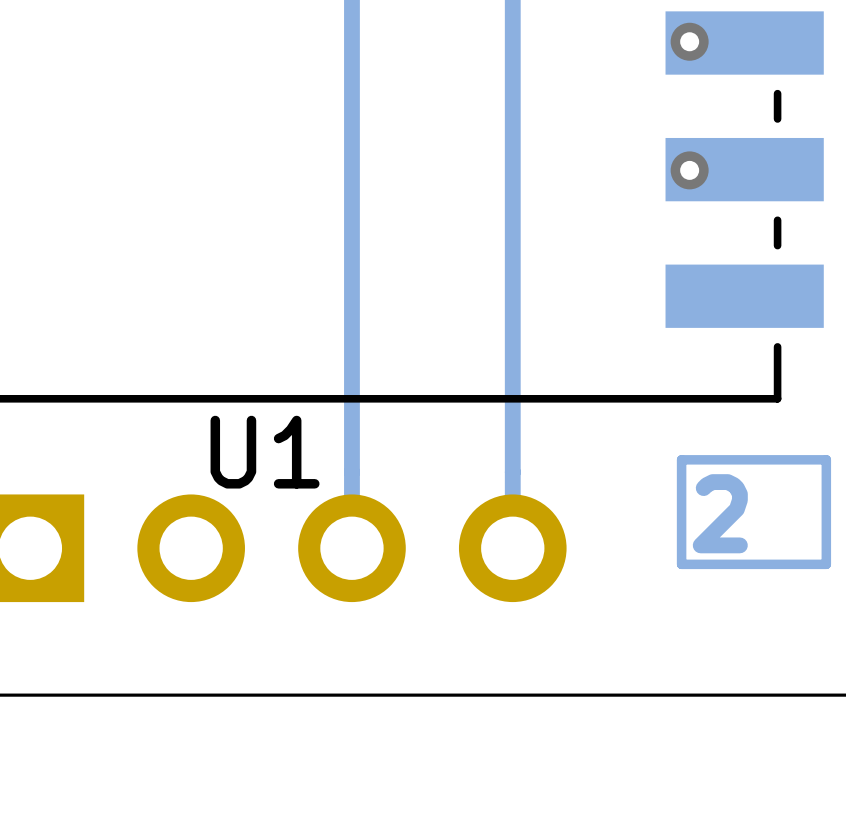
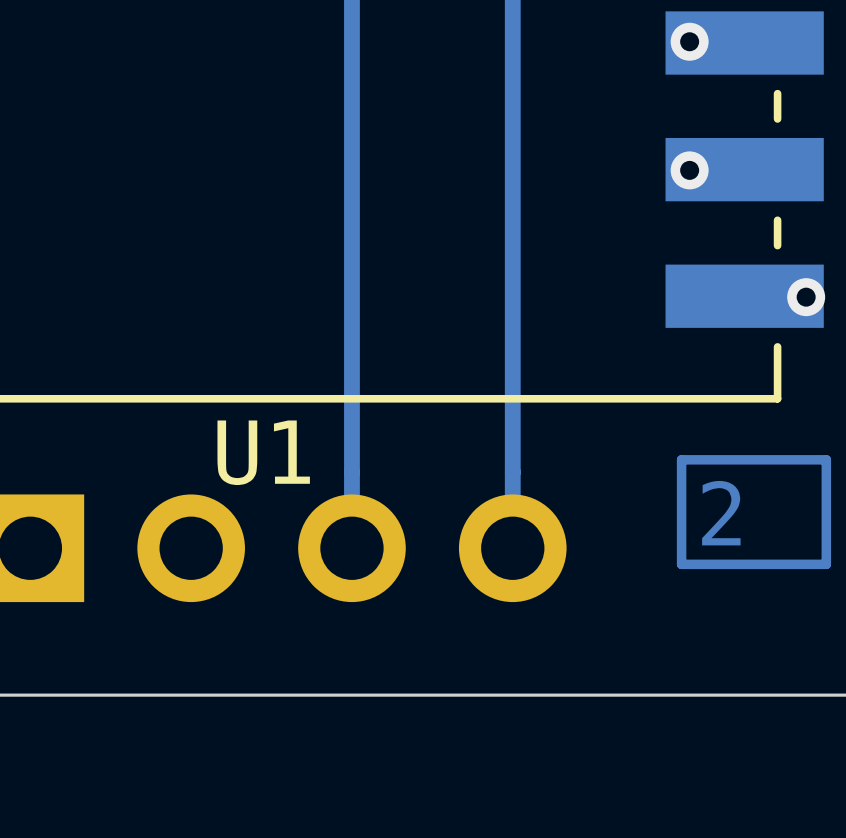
via: none -> (806, 297)

